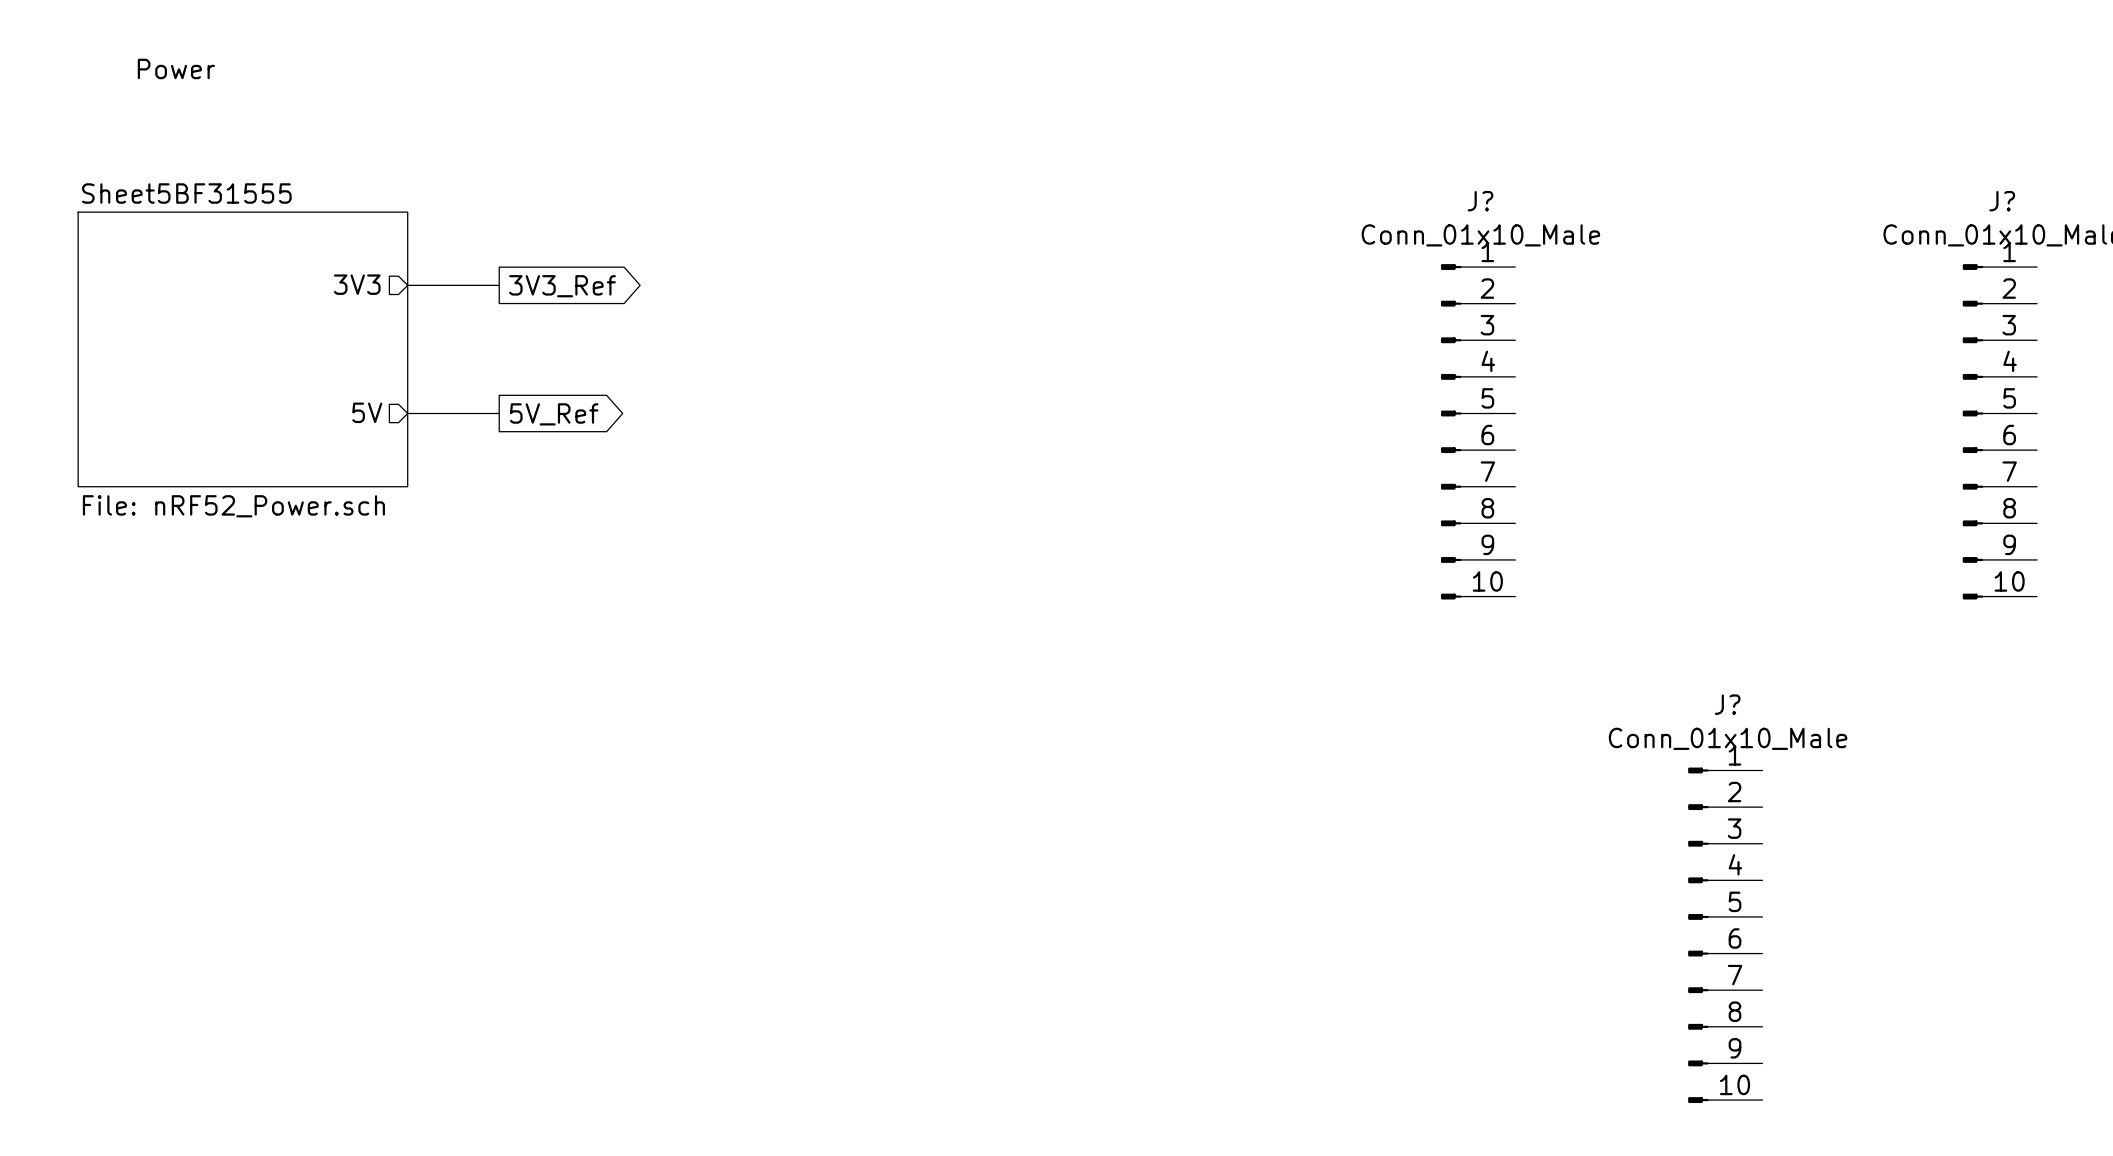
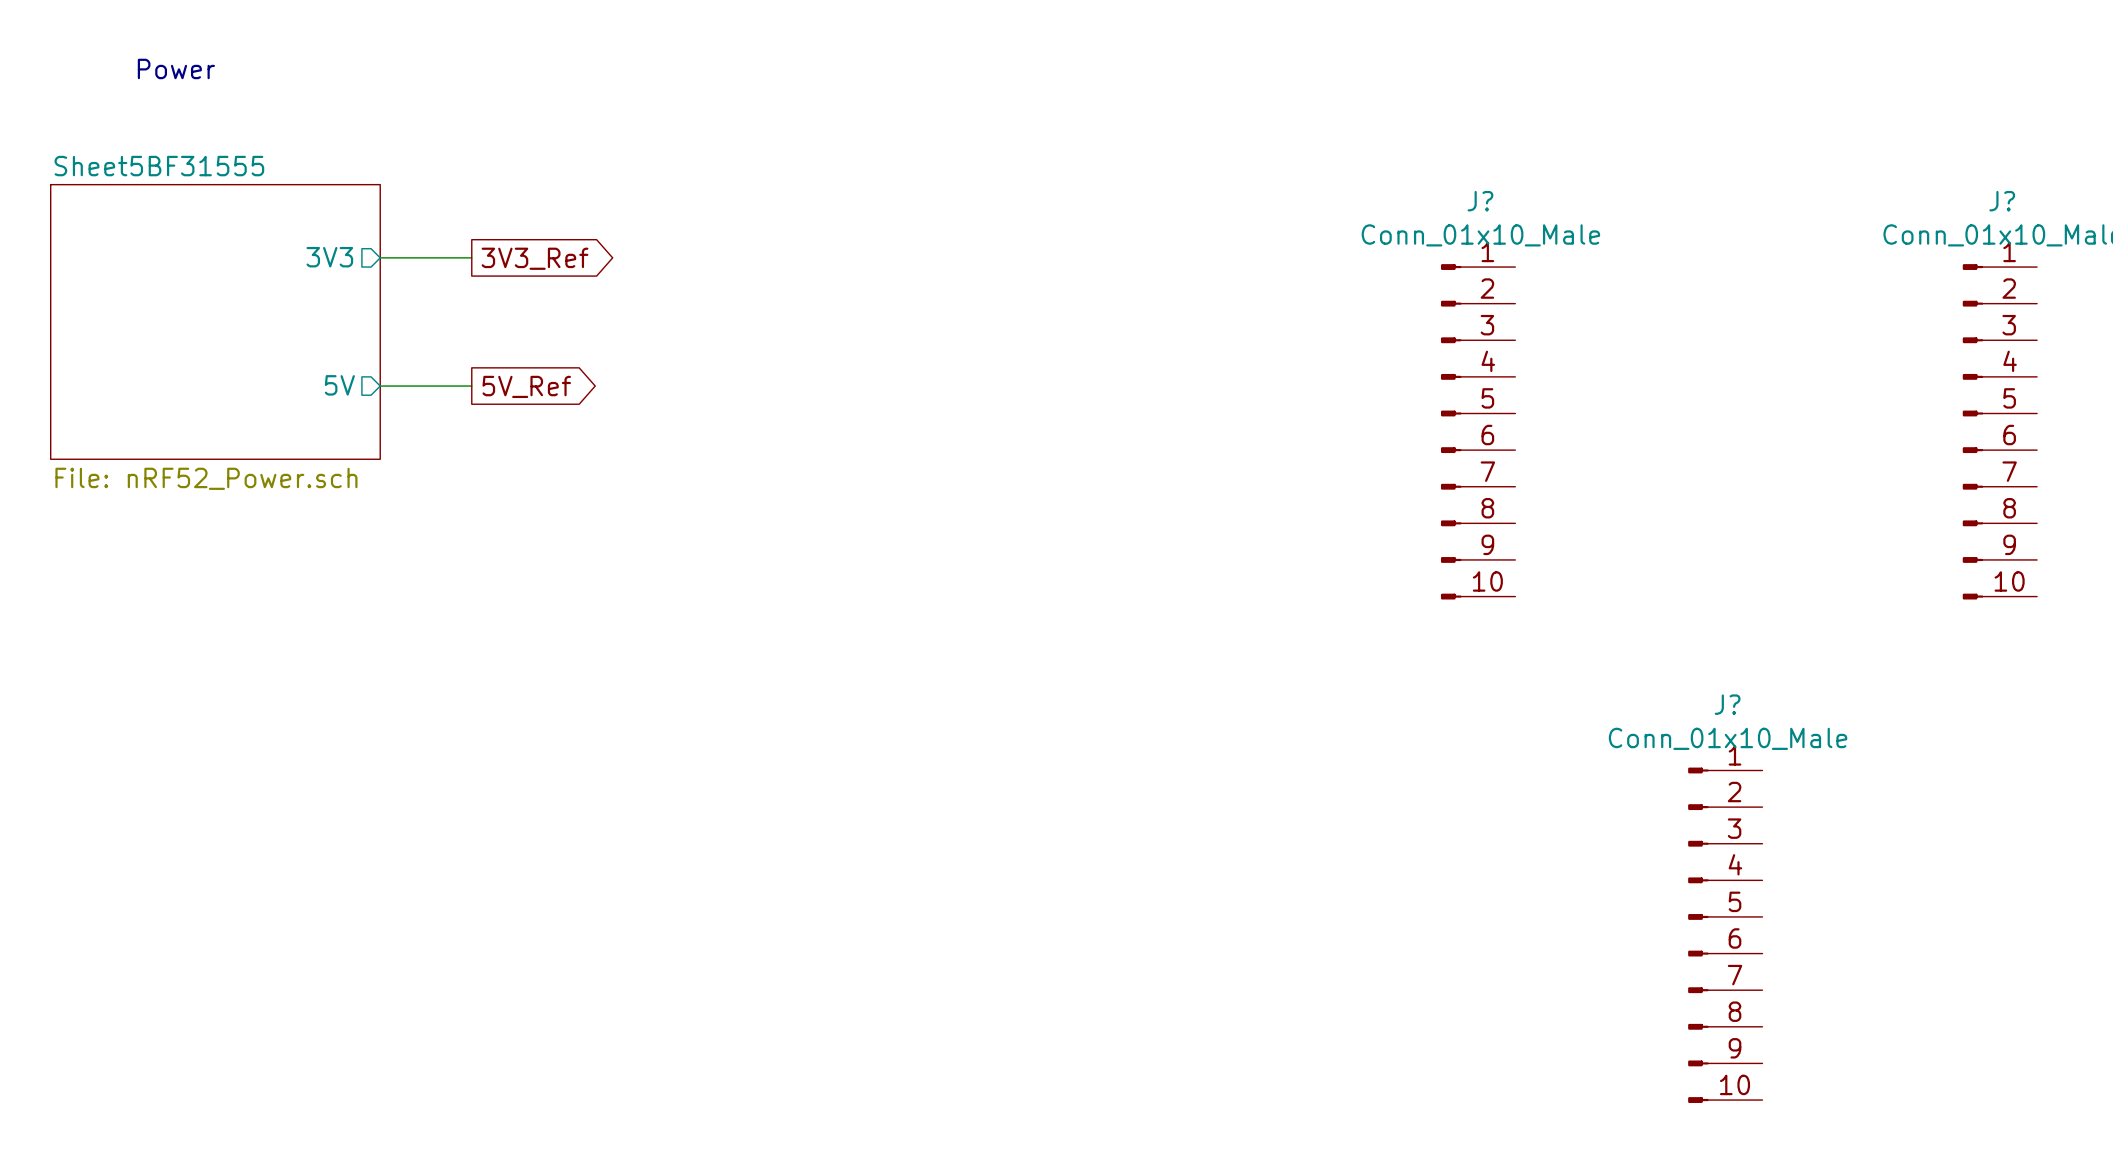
sheet pin position: 3V3 (357, 284) -> 3V3 (329, 257)
wire: (407, 285) (499, 285) -> (380, 257) (471, 257)
global label position: 3V3_Ref (562, 286) -> 3V3_Ref (535, 258)
sheet Sheet5BF31555 position: (242, 349) -> (215, 321)
sheet pin position: 5V (367, 412) -> 5V (339, 385)
wire: (407, 413) (499, 413) -> (380, 386) (471, 386)
global label position: 5V_Ref (554, 414) -> 5V_Ref (526, 386)

